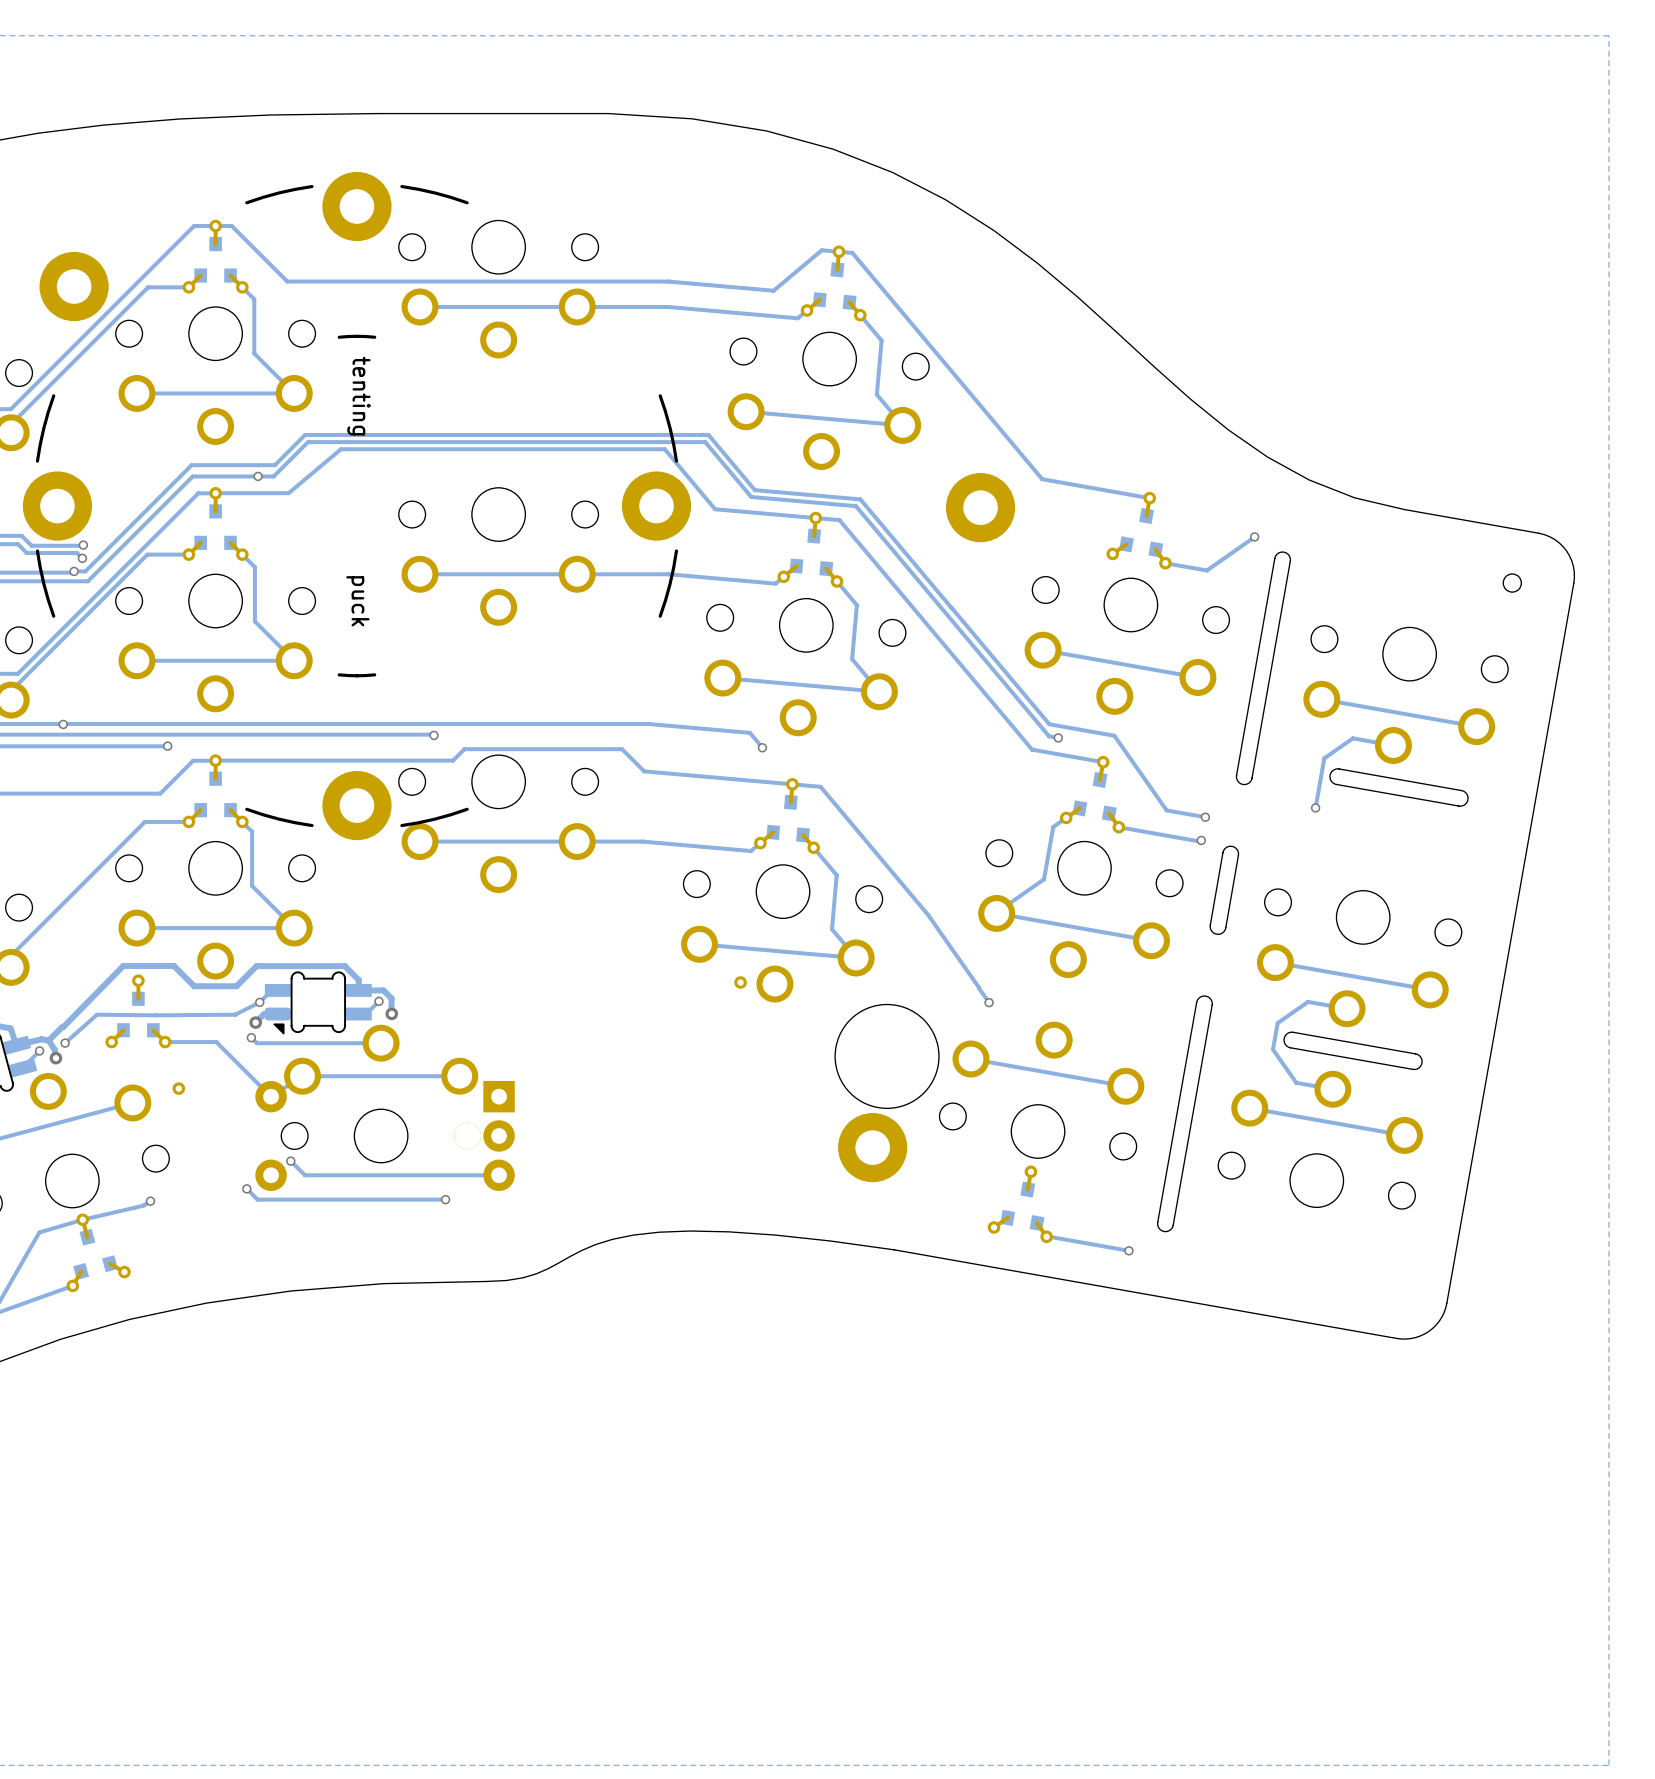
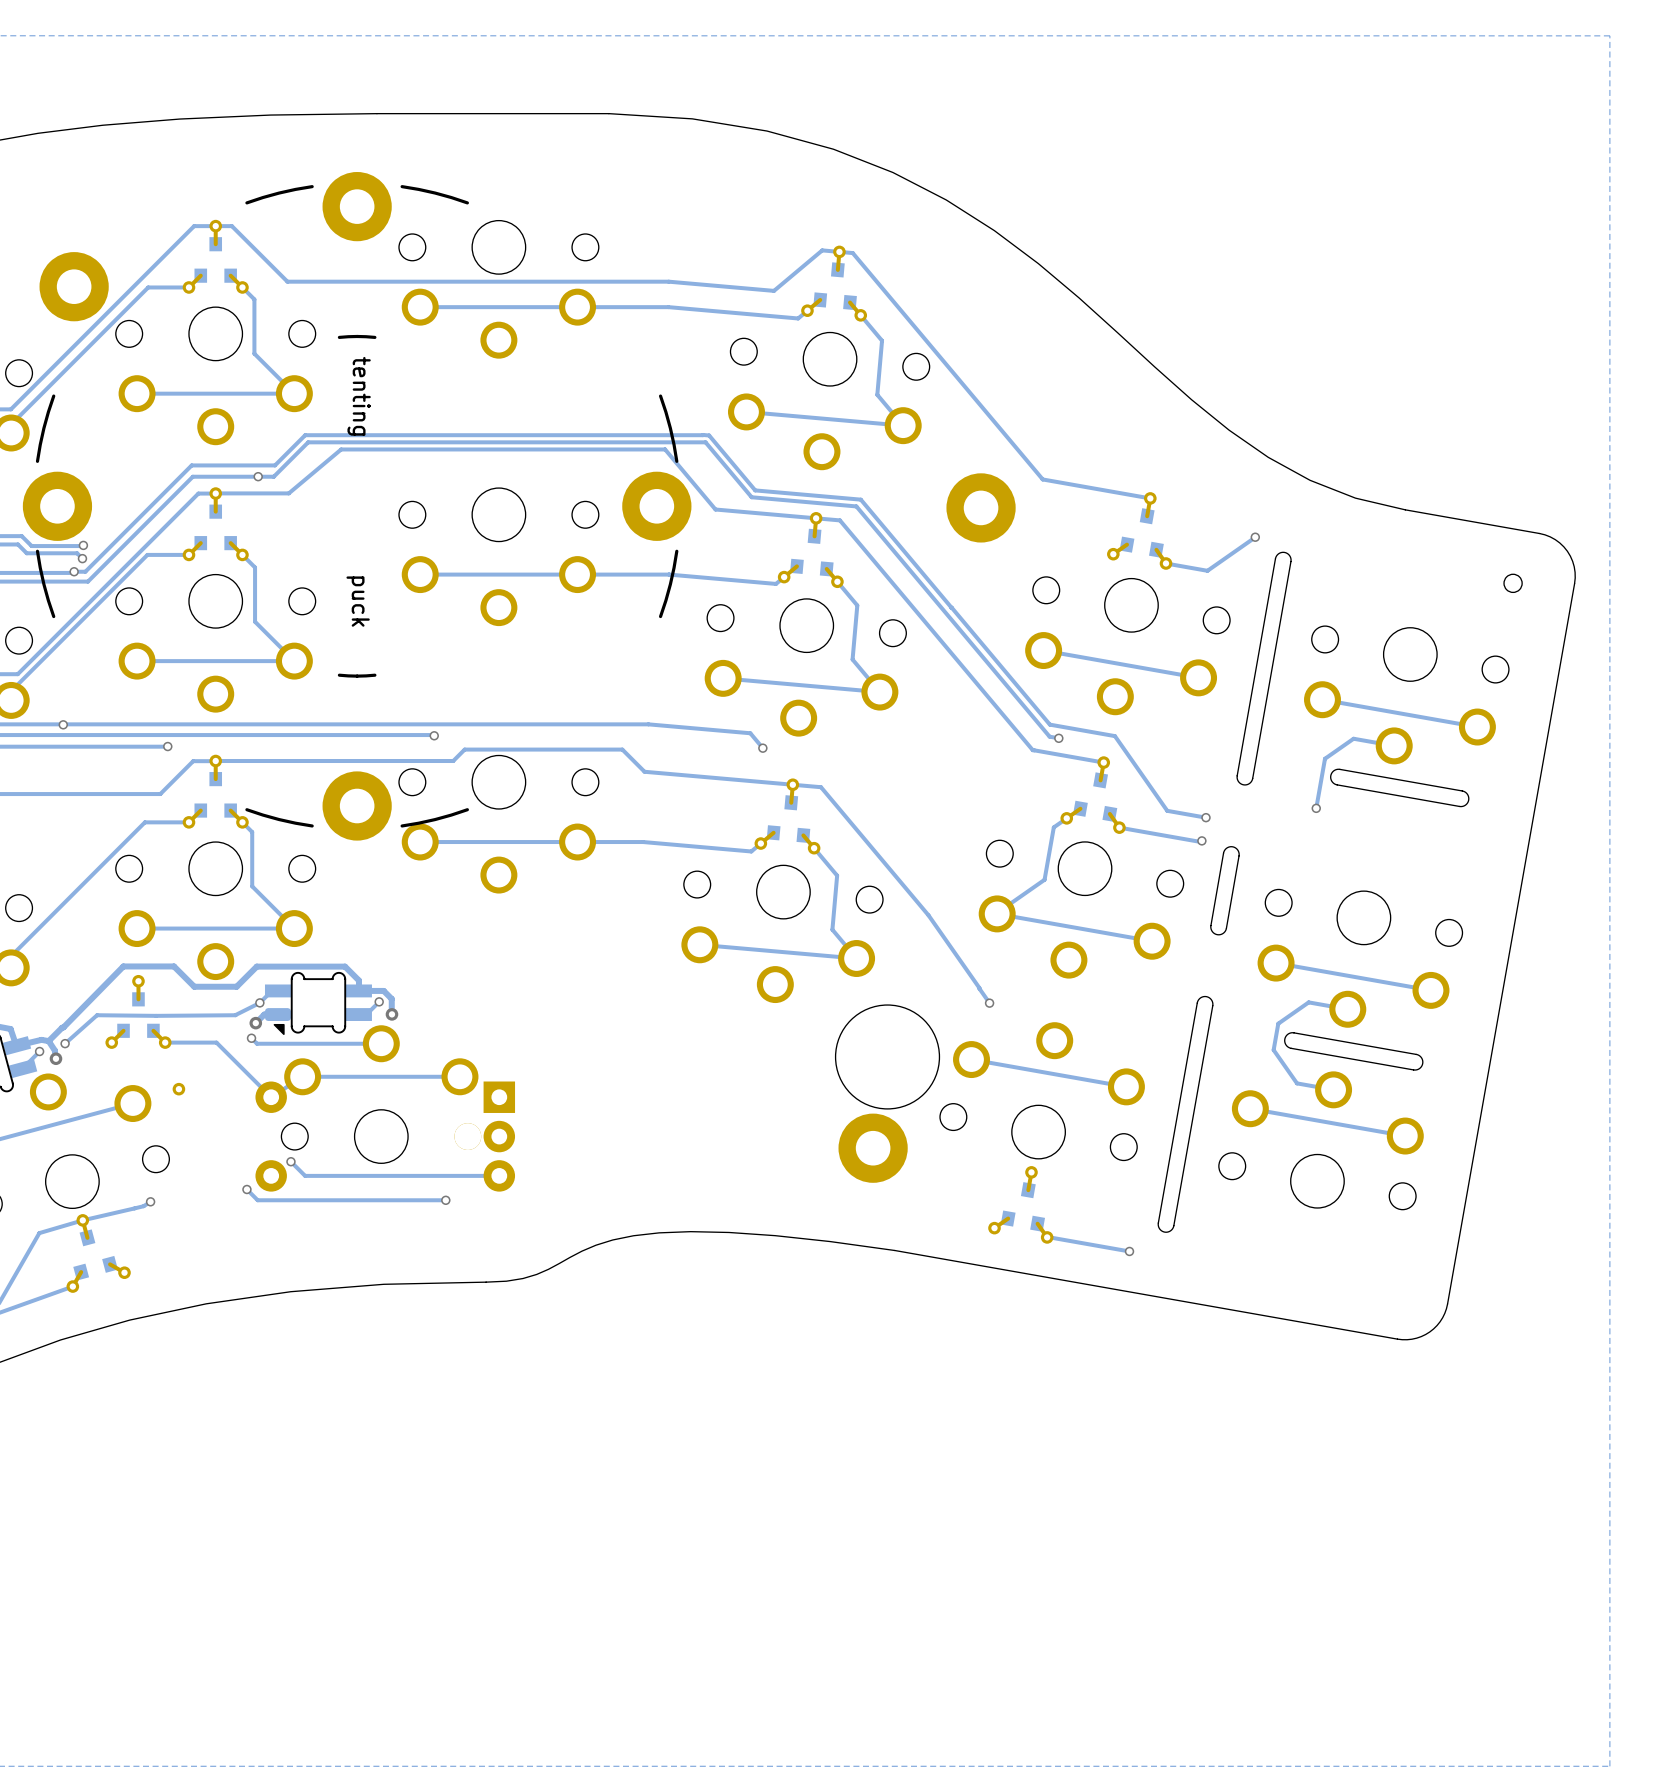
part: (740, 982) -> none

